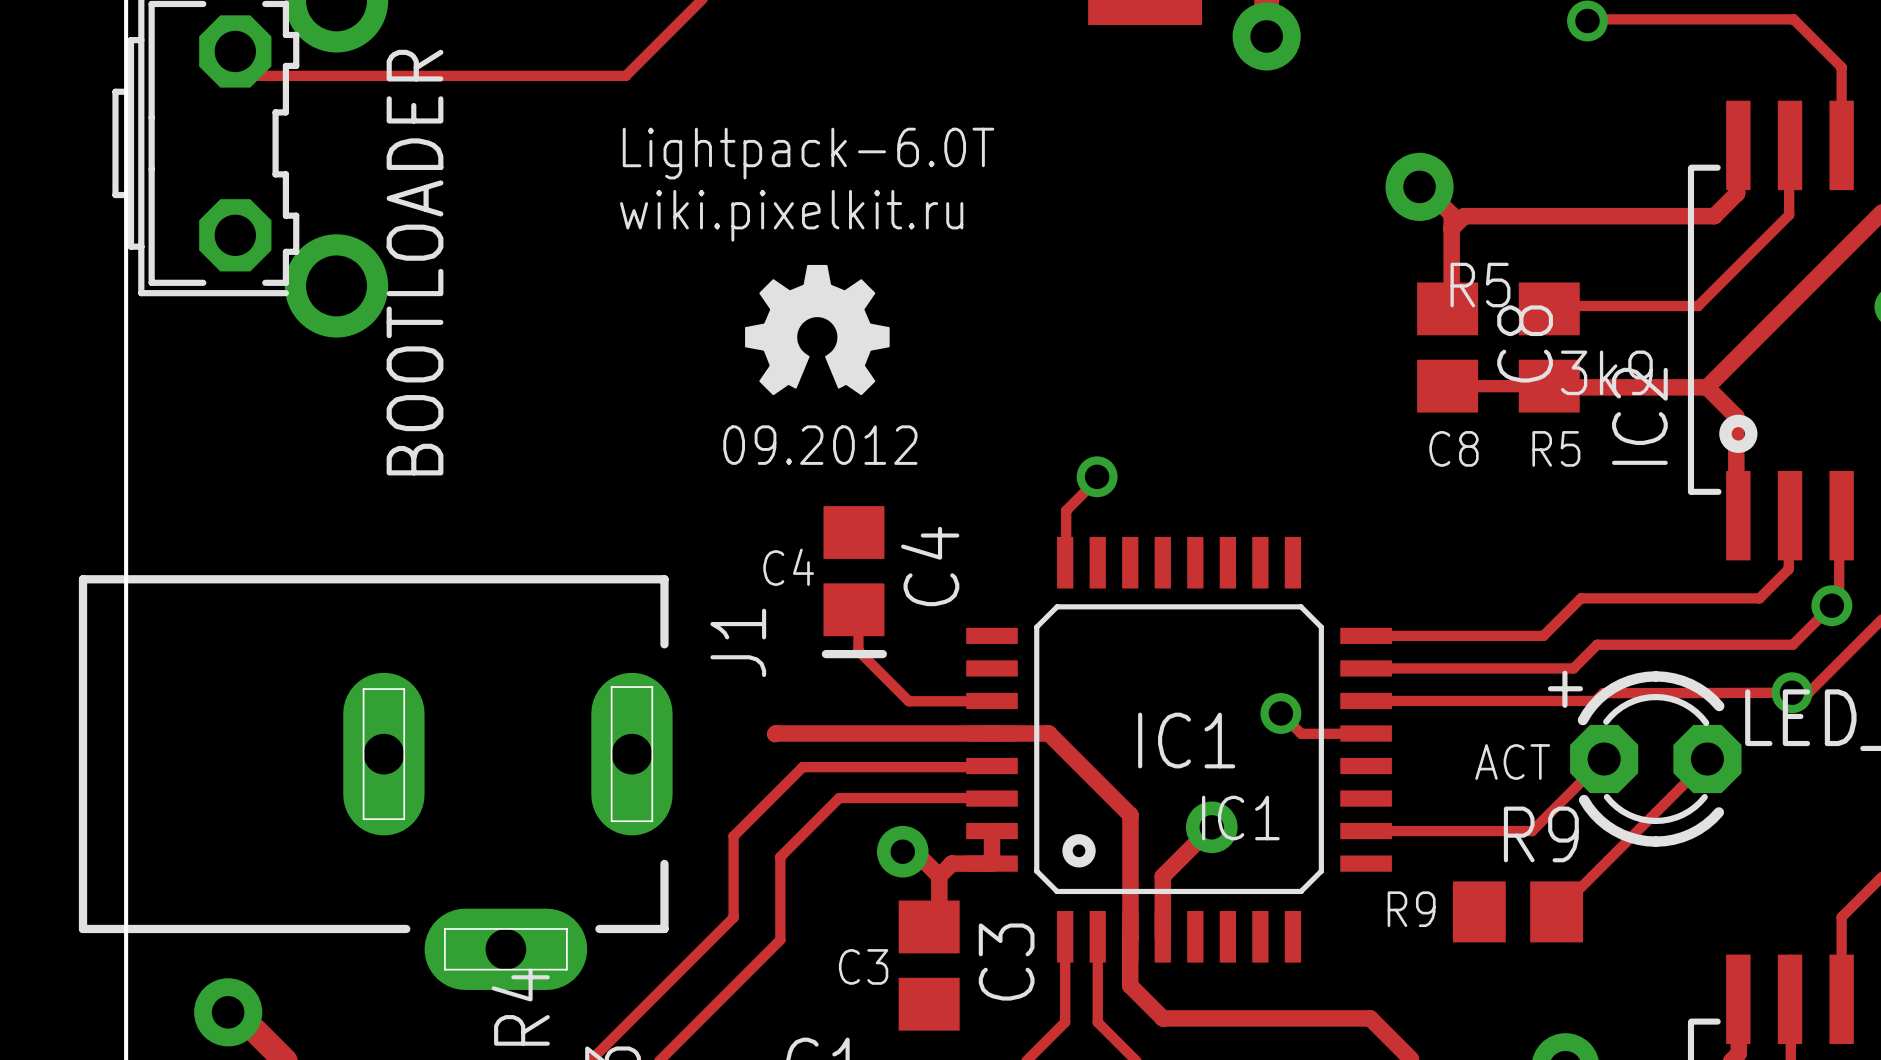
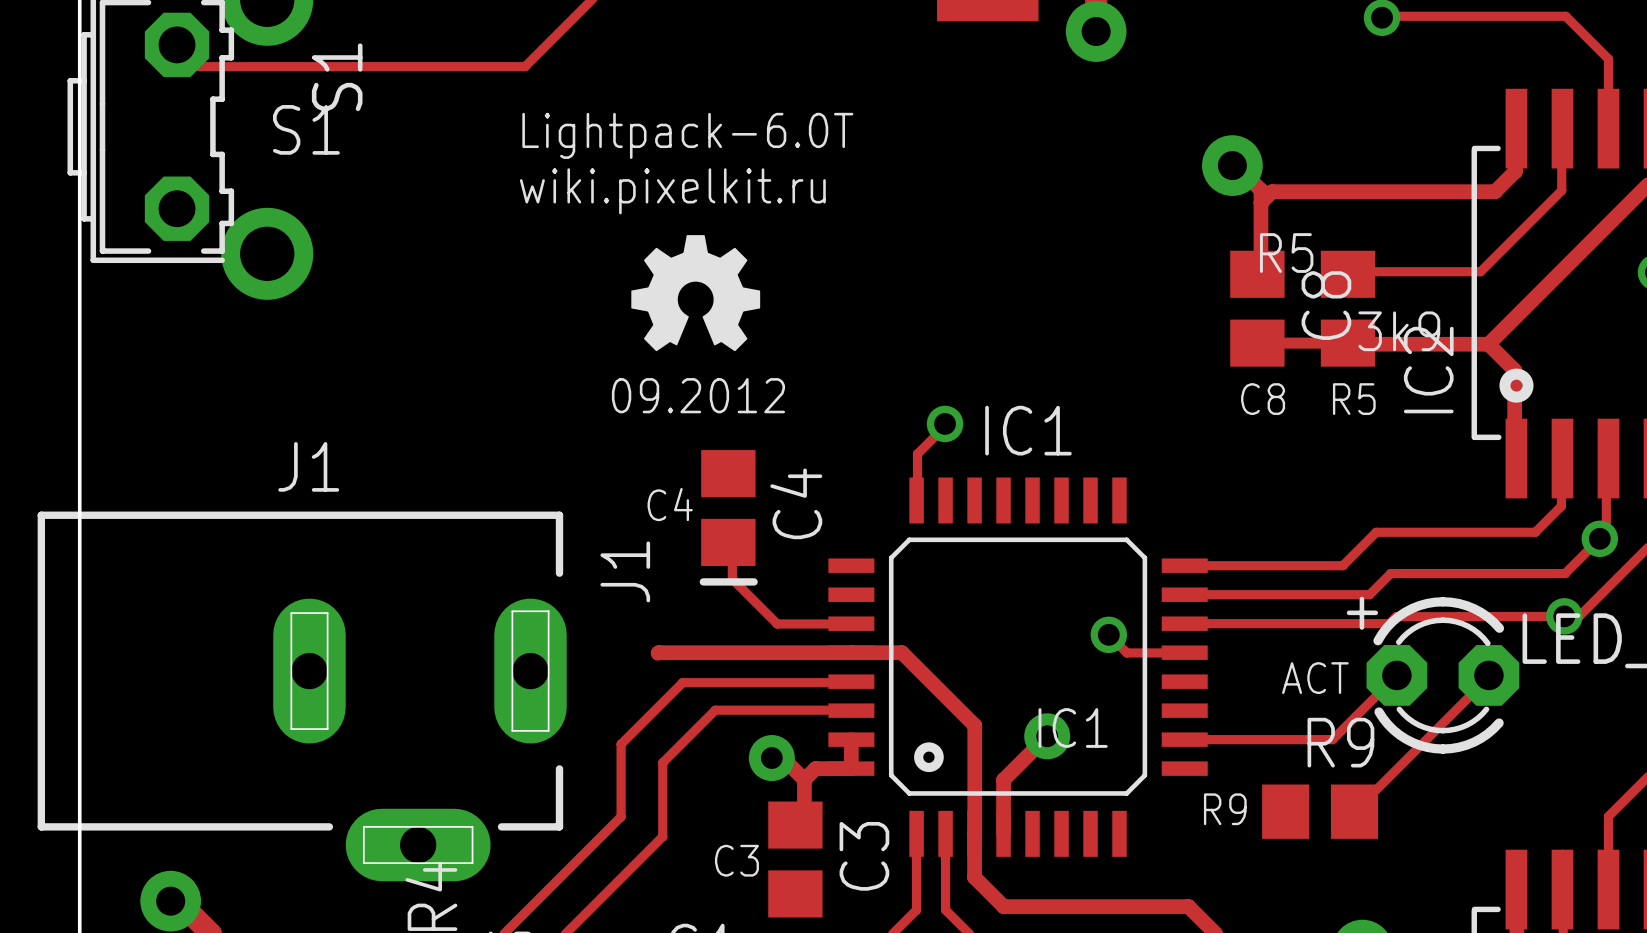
text: none -> S1 (306, 129)
BOOTLOADER name: BOOTLOADER (415, 262) -> S1 (337, 77)
text: none -> J1 (308, 466)
text position: IC1 (1186, 740) -> IC1 (1028, 430)

